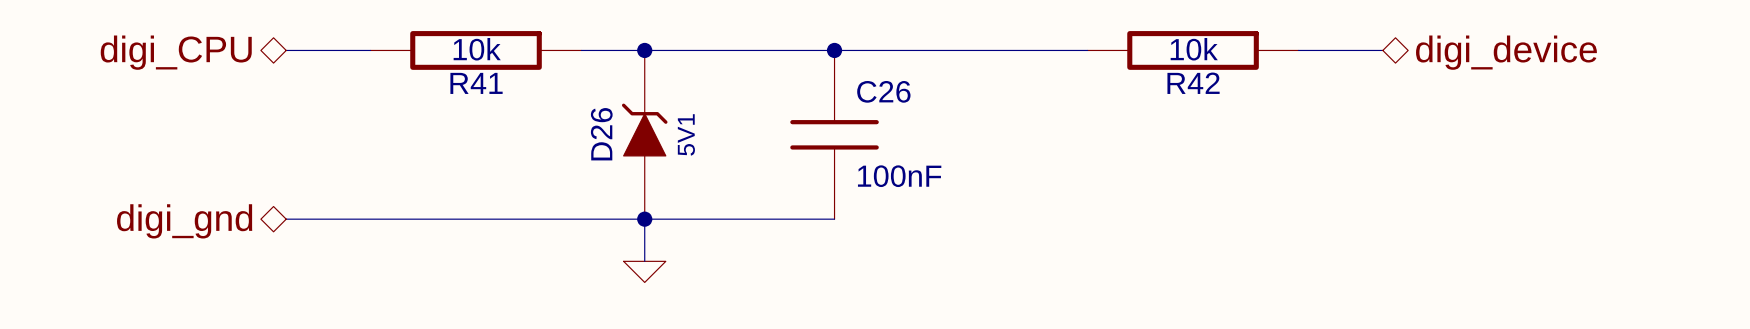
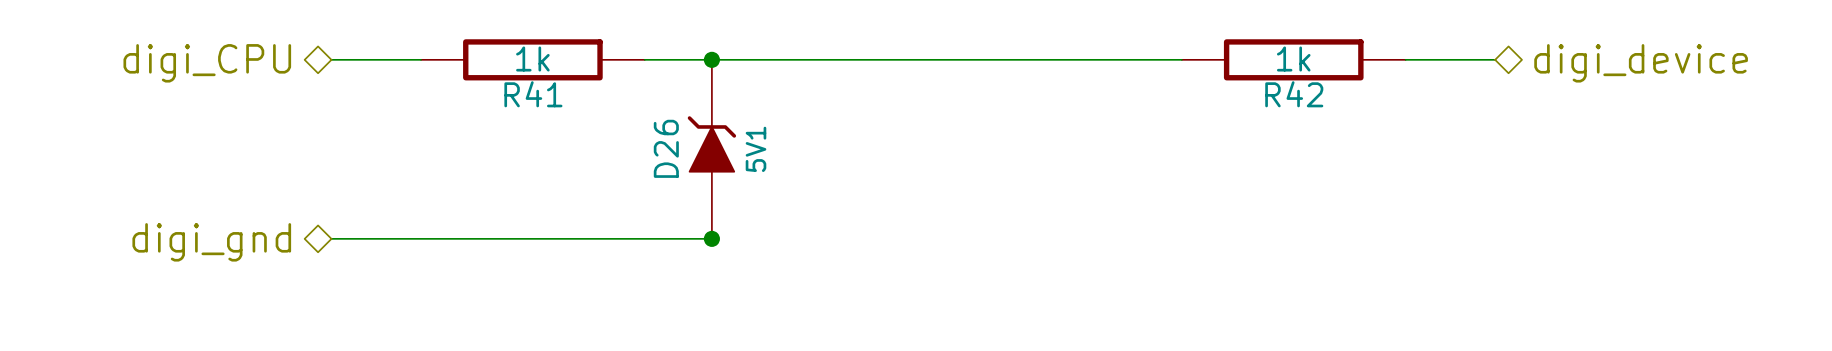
R41 value: 10k (477, 49) -> 1k (532, 59)
R42 value: 10k (1194, 49) -> 1k (1293, 59)
junction: (834, 50) -> none
C26: 100nF (834, 134) -> none
wire: (834, 219) (644, 219) (644, 261) -> none
power symbol: (644, 271) -> none

